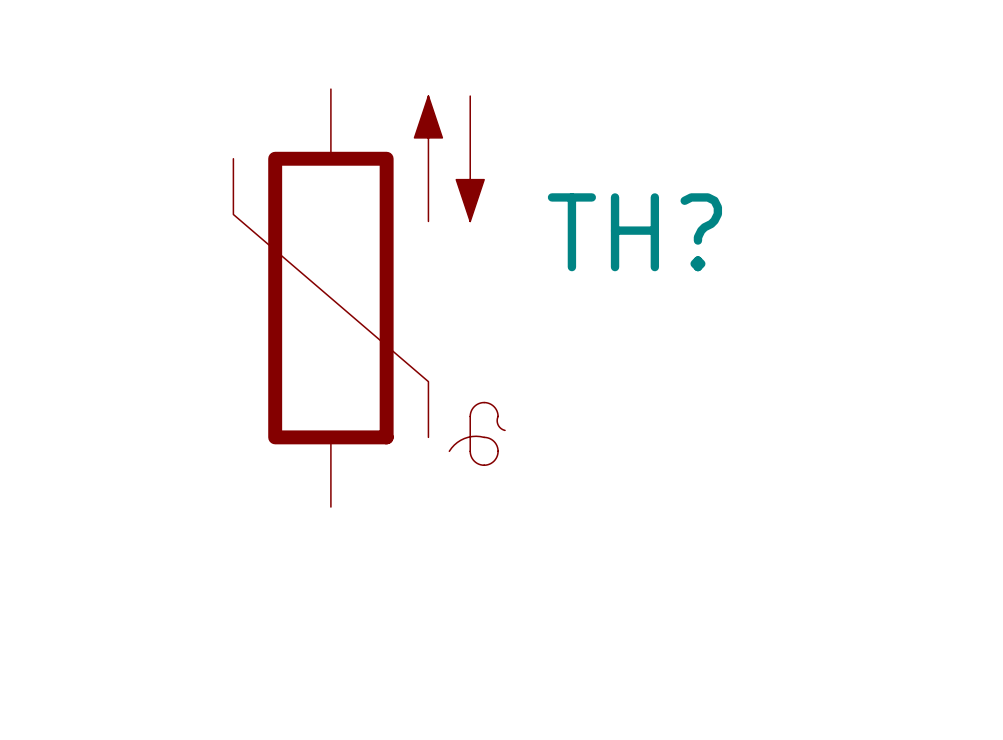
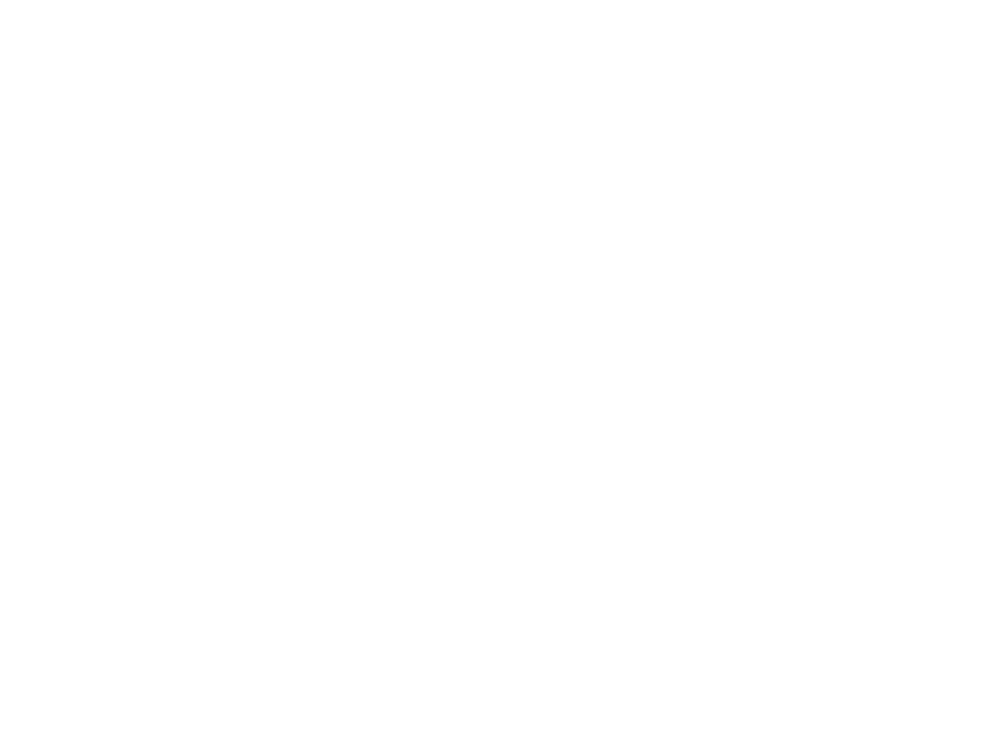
TH?: (369, 298) -> none

